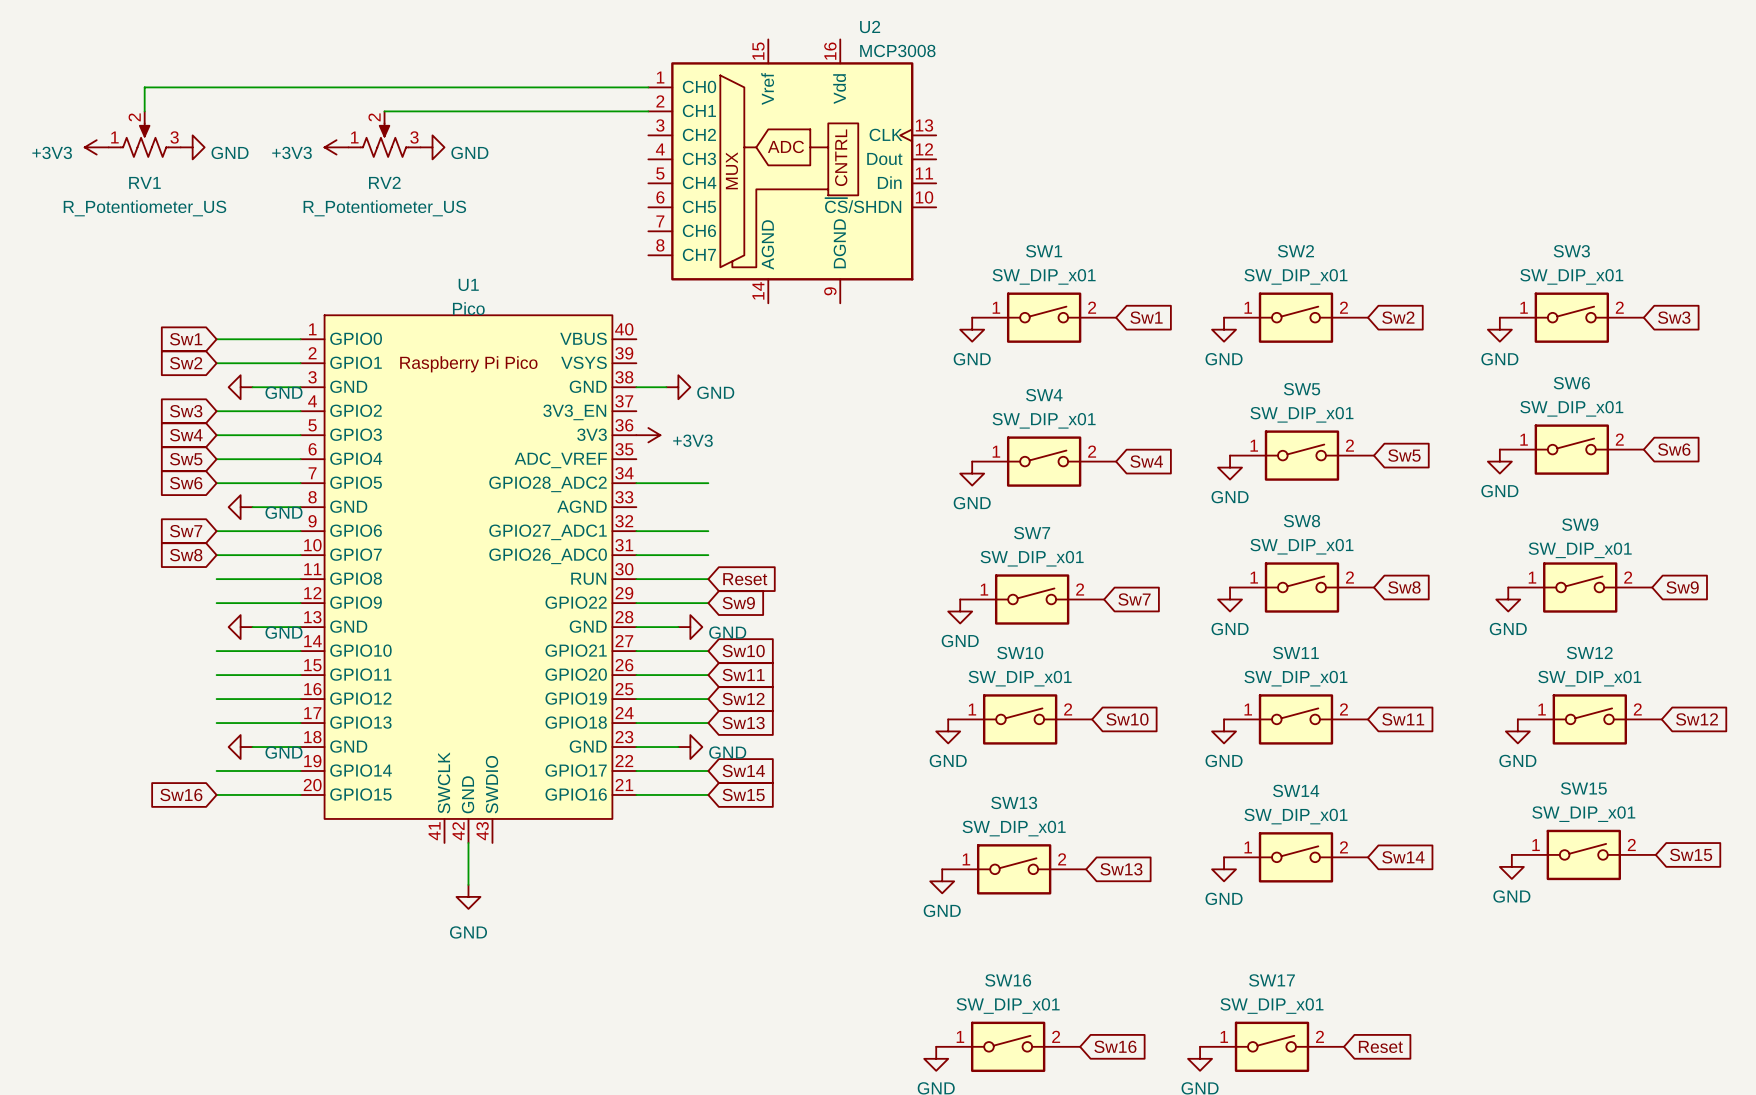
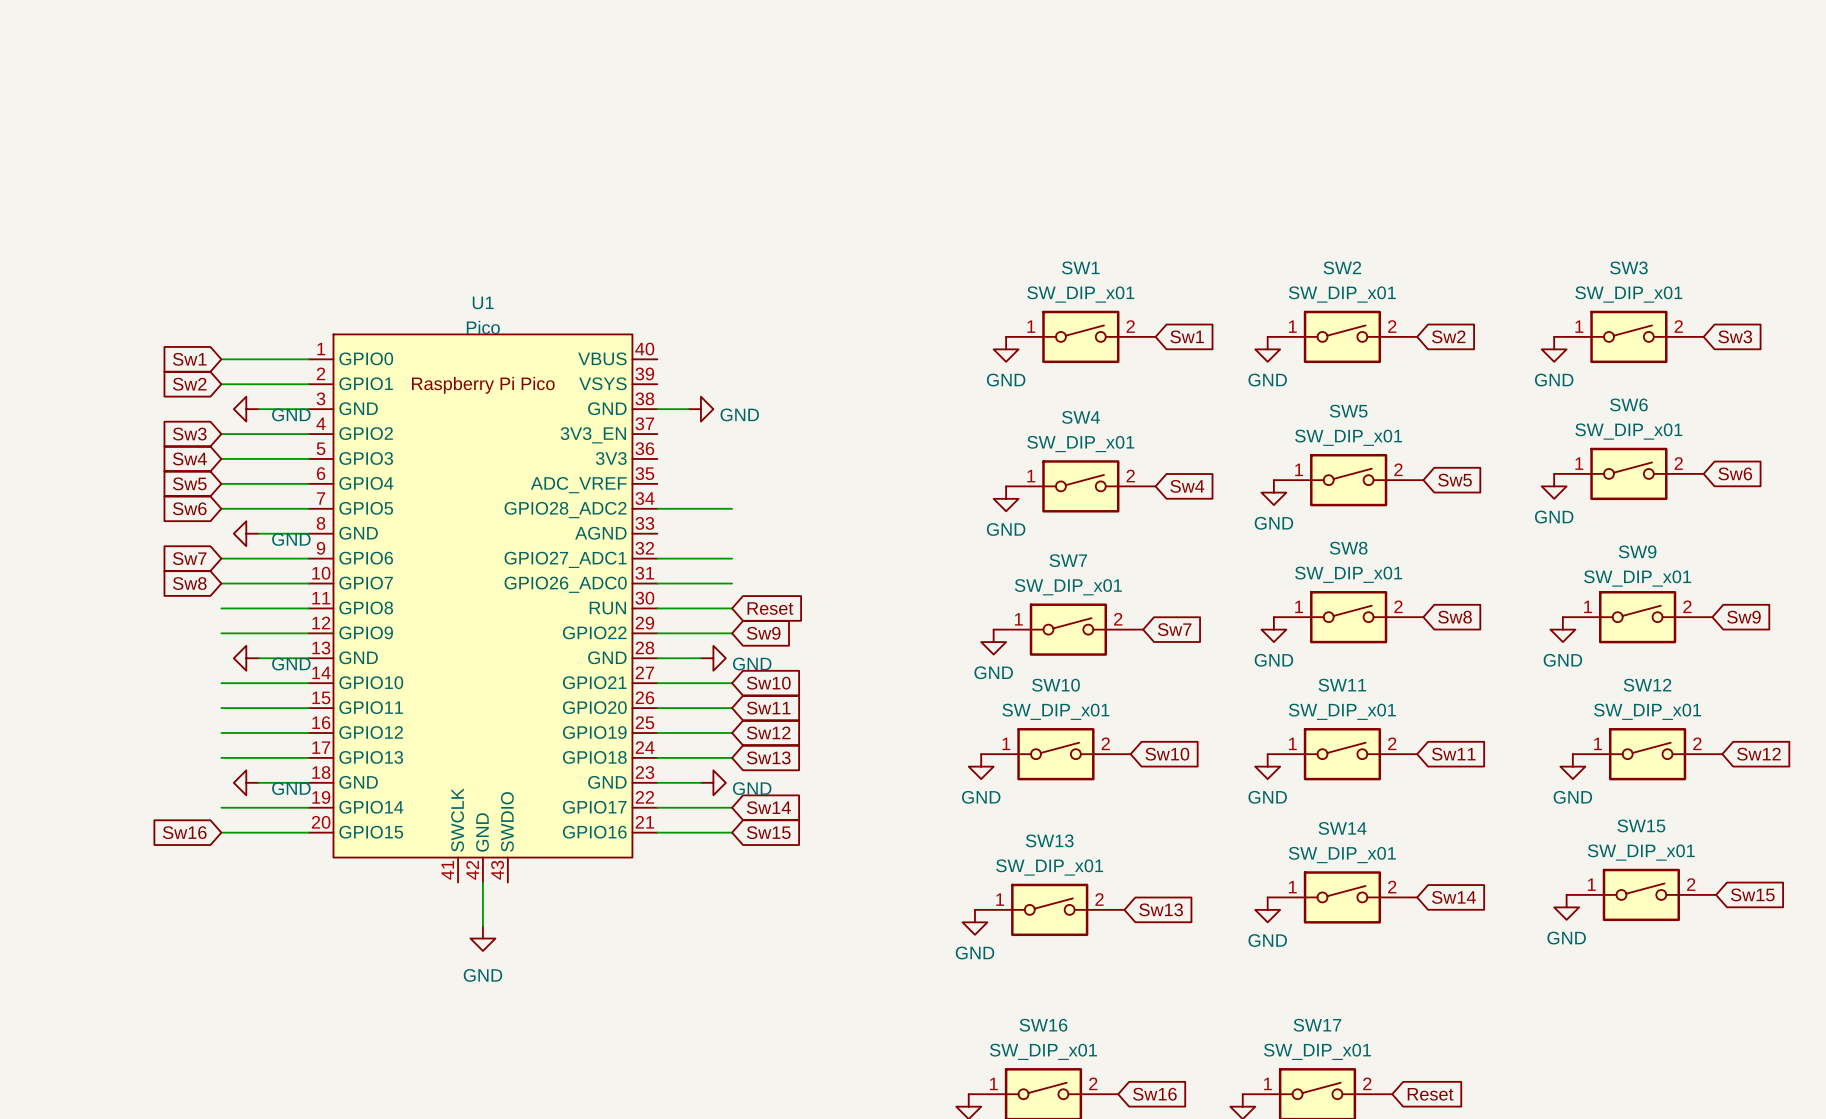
wire: (648, 87) (144, 87) (144, 111) -> none
wire: (384, 111) (648, 111) -> none
RV1: R_Potentiometer_US (144, 134) -> none
RV2: R_Potentiometer_US (384, 134) -> none
power symbol: +3V3 (96, 147) -> none
power symbol: GND (192, 147) -> none
power symbol: +3V3 (336, 147) -> none
power symbol: GND (432, 147) -> none
U2: MCP3008 (792, 171) -> none
power symbol: +3V3 (648, 435) -> none

